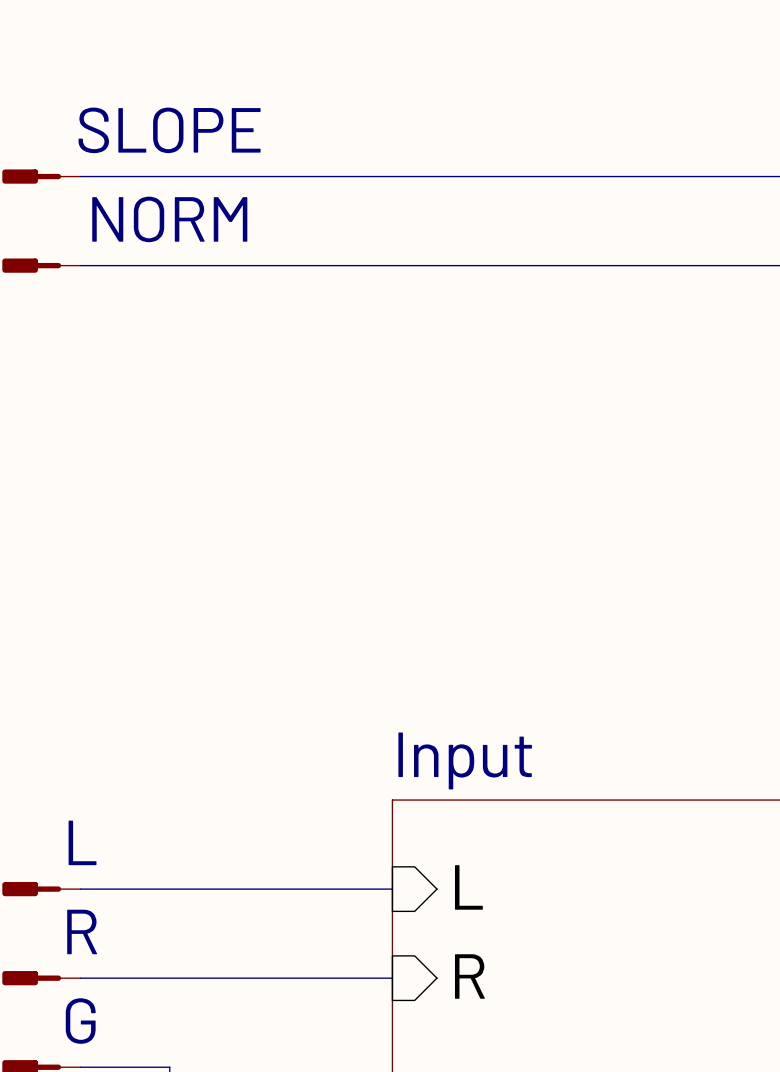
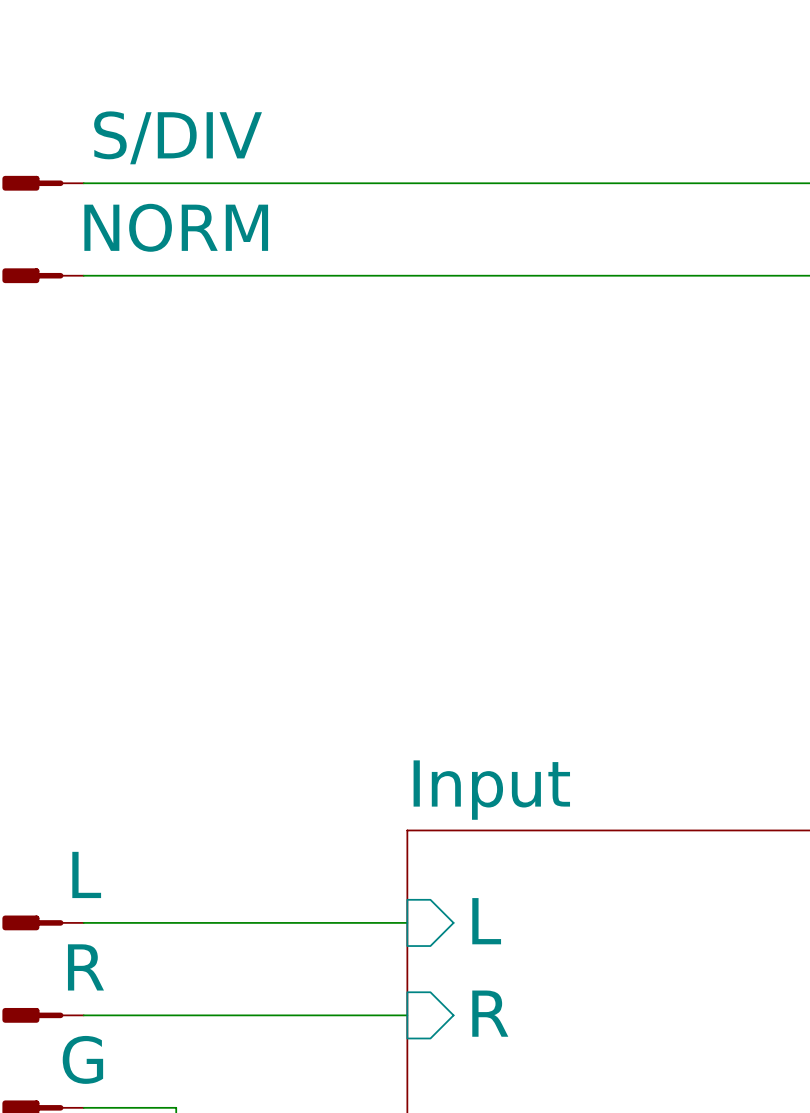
part value: SLOPE (169, 130) -> S/DIV (178, 137)

